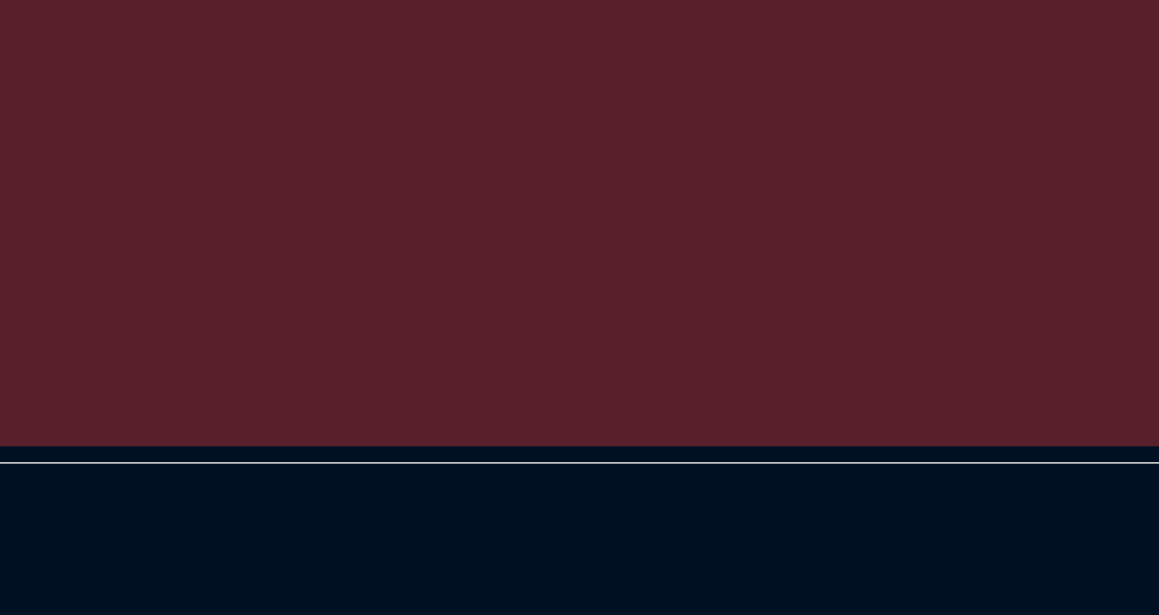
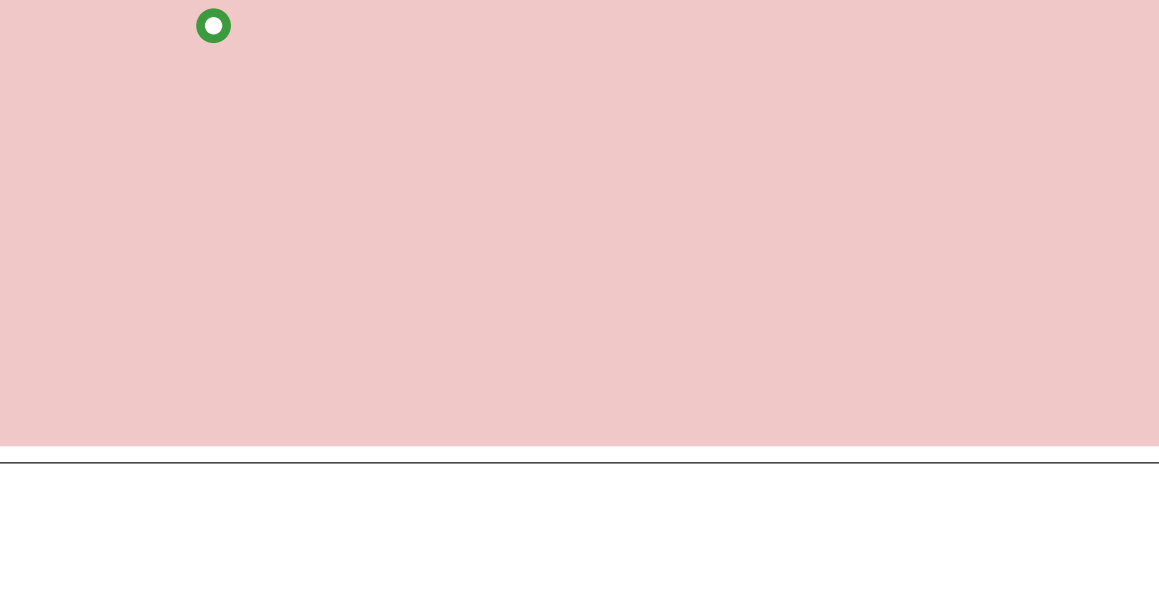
via: none -> (213, 25)

